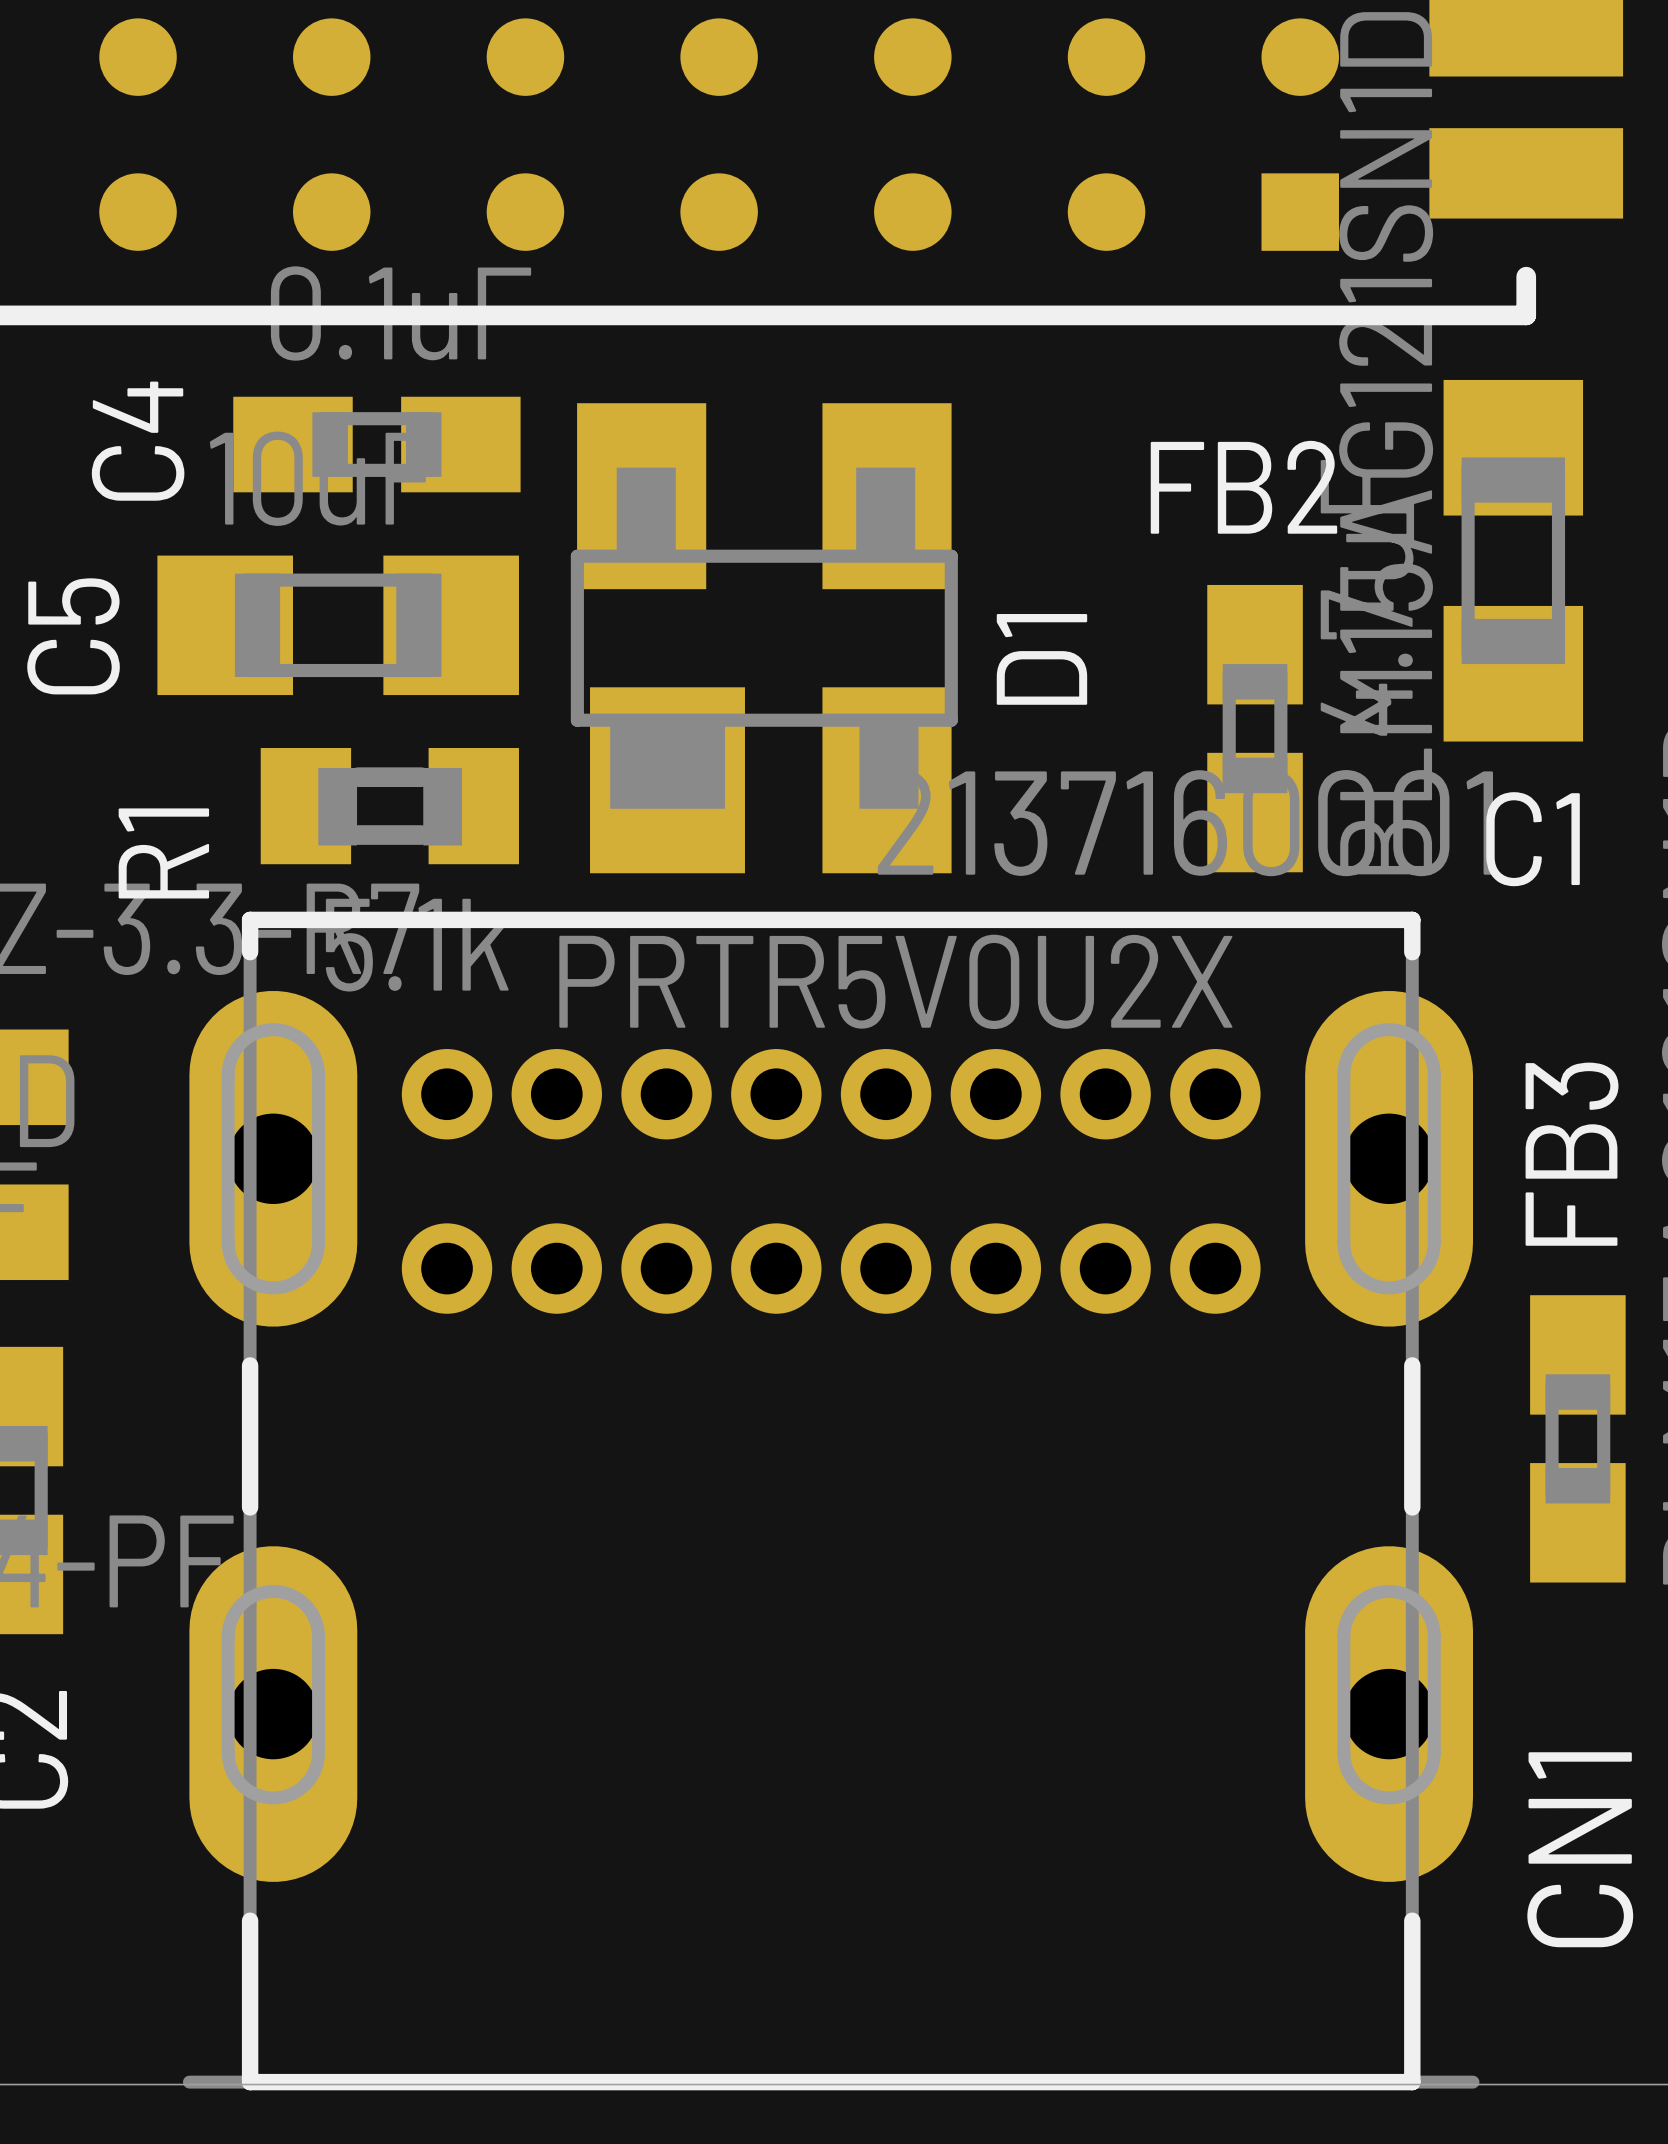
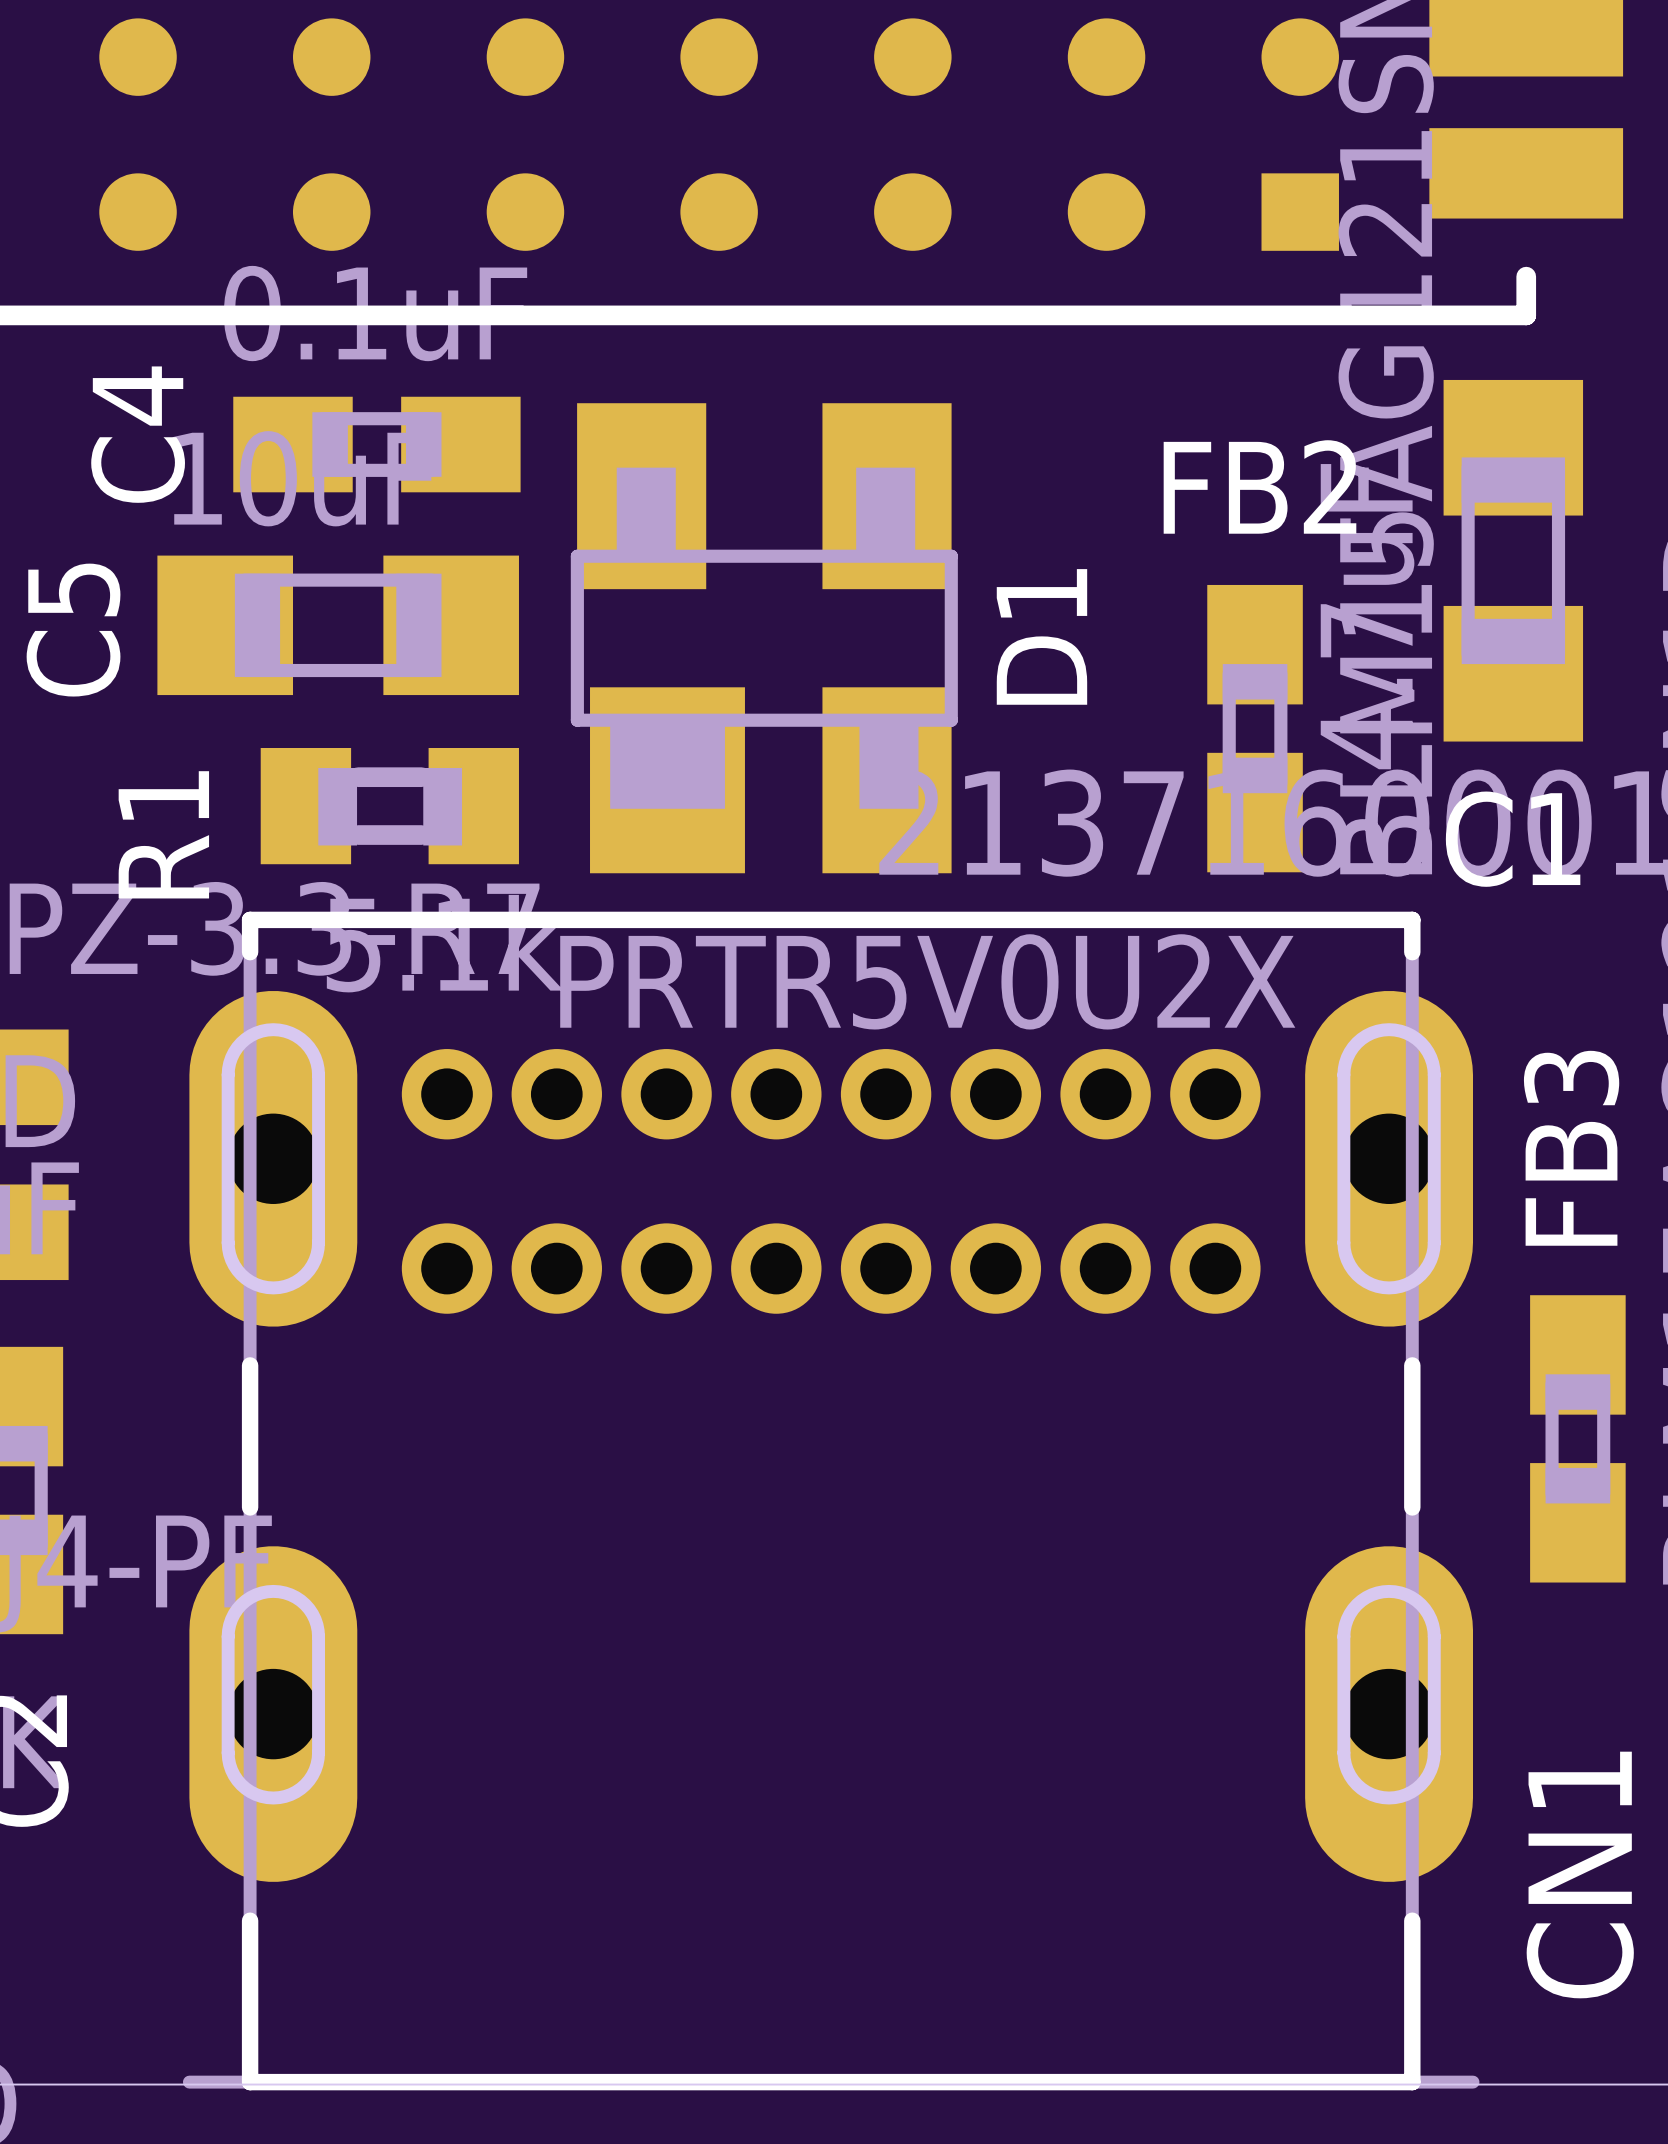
FB2 name position: FB2 (1243, 487) -> FB2 (1259, 486)

